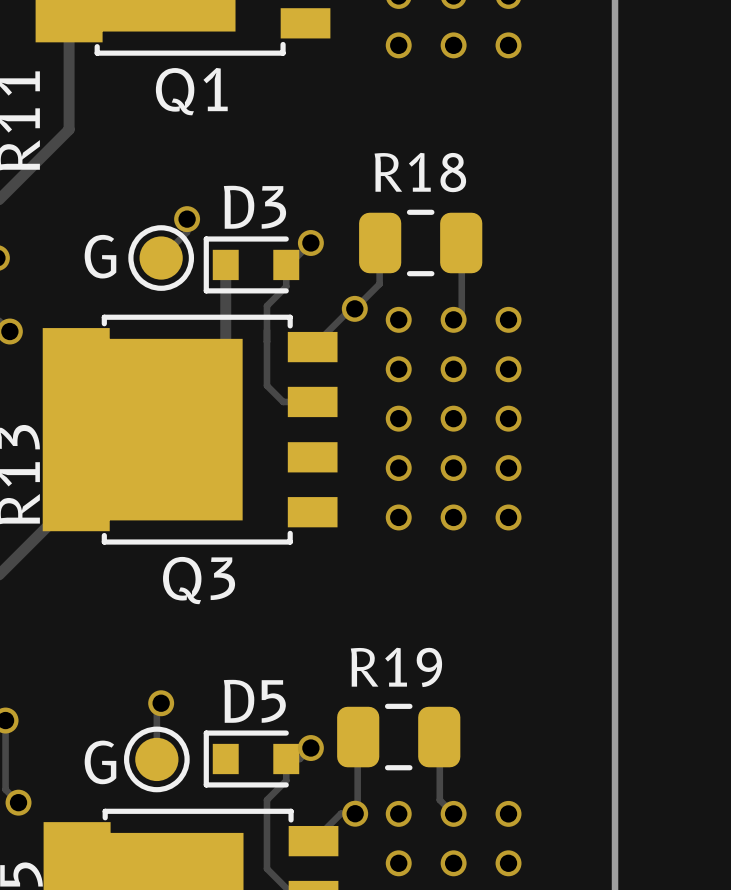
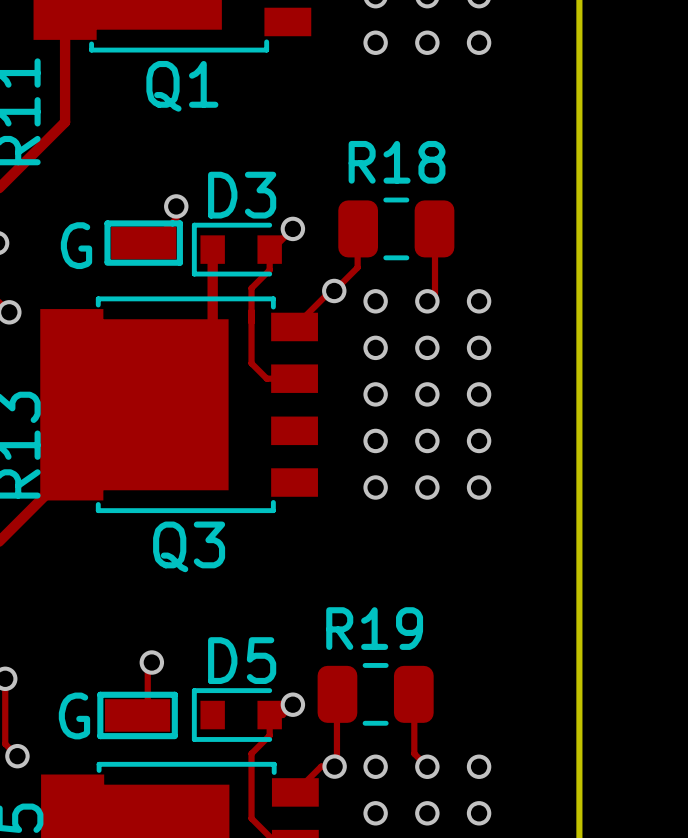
part: none -> (143, 243)
G: (161, 258) -> none
text: none -> G (76, 245)
part: none -> (137, 715)
G: (156, 759) -> none
text: none -> G (74, 715)

